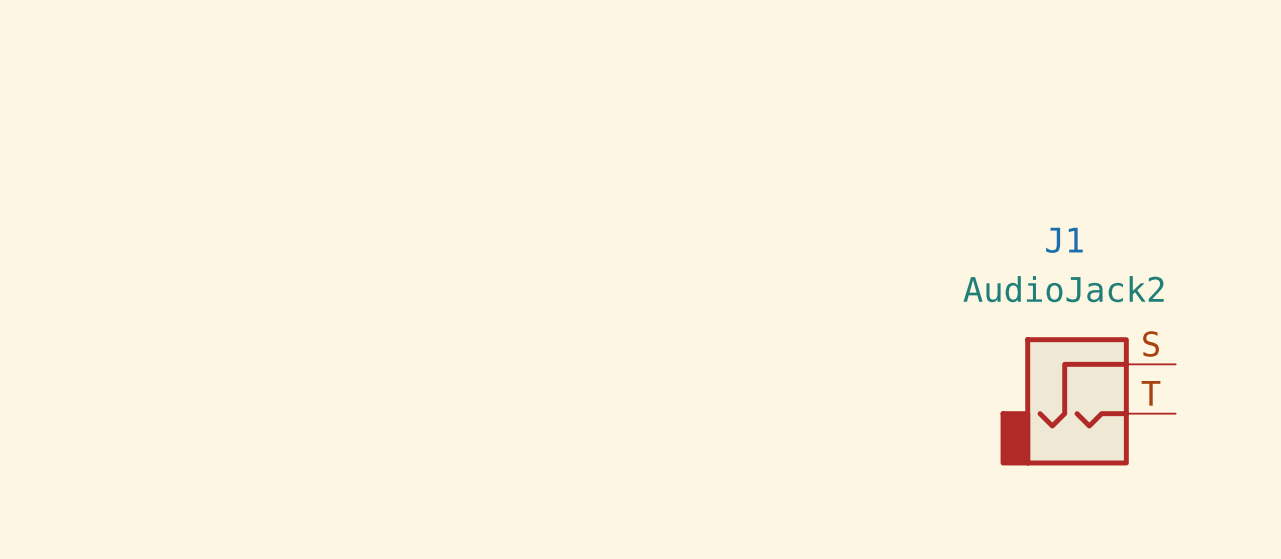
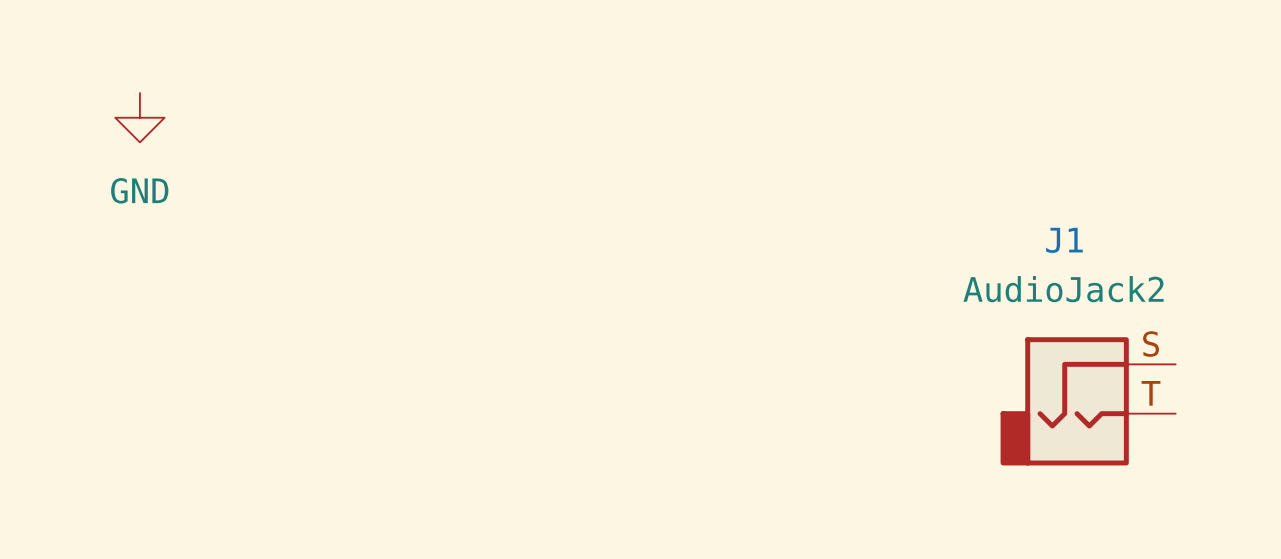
power symbol: none -> GND (139, 117)

